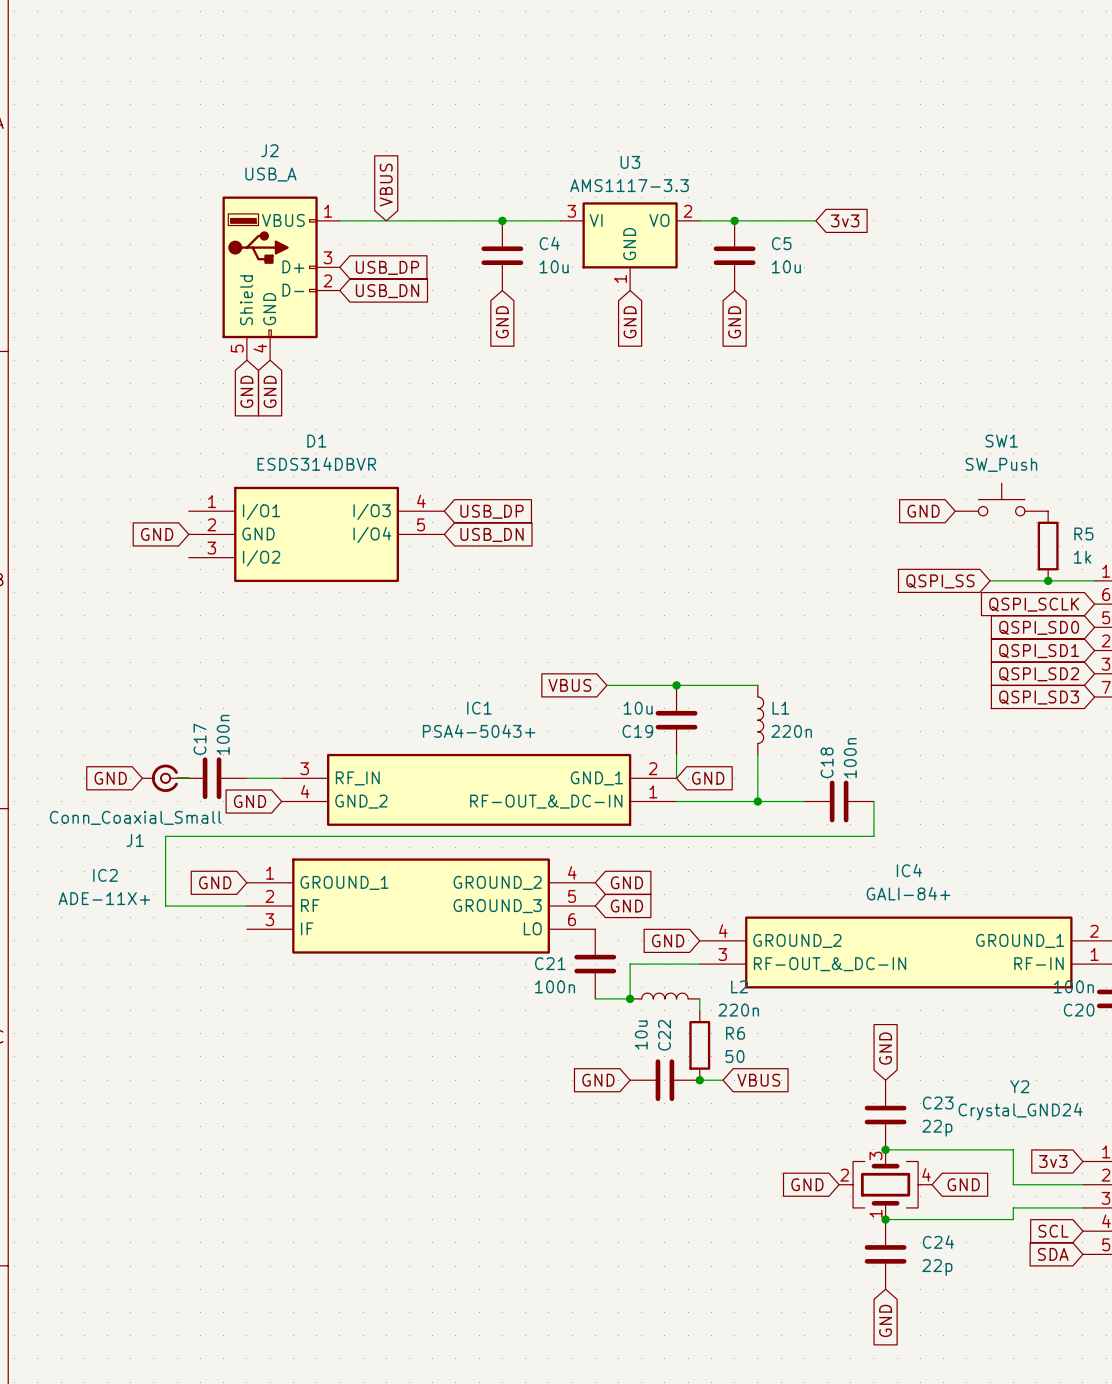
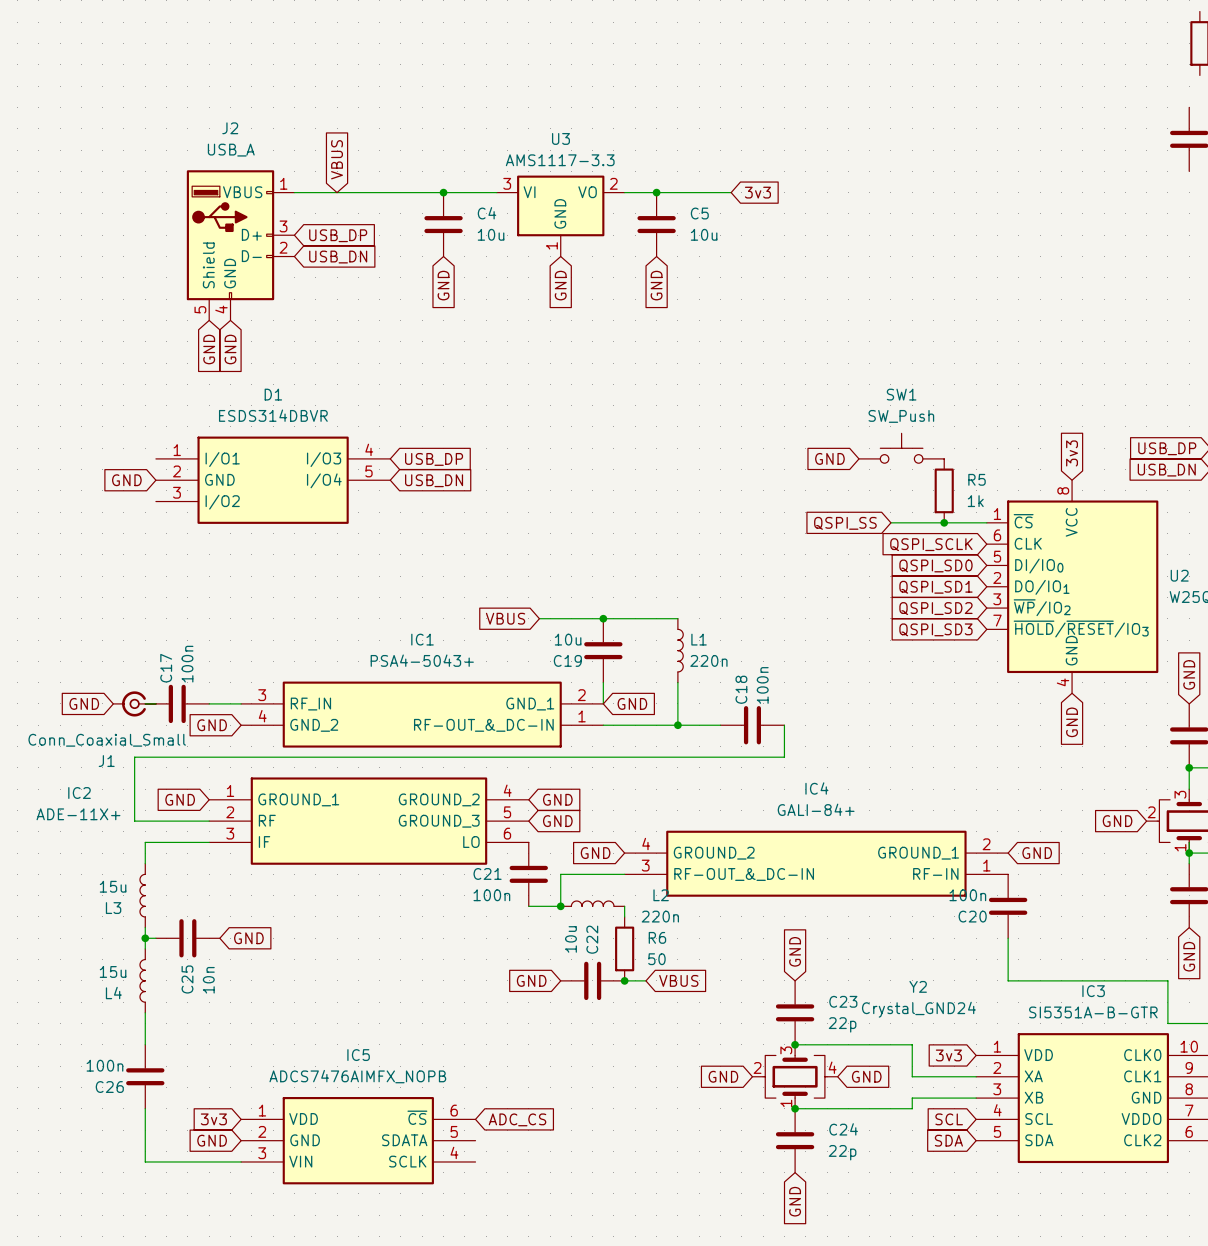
wire: none -> (209, 842) (145, 842) (145, 863)
L3: none -> 15u (142, 895)
wire: none -> (145, 927) (145, 948)
wire: none -> (145, 938) (155, 938)
junction: none -> (145, 938)
C25: none -> 10n (187, 938)
global label: none -> GND (248, 938)
L4: none -> 15u (142, 980)
wire: none -> (145, 1012) (145, 1044)
C26: none -> 100n (145, 1076)
wire: none -> (145, 1108) (145, 1161) (241, 1161)
global label: none -> 3v3 (213, 1119)
global label: none -> ADC_CS (517, 1119)
global label: none -> GND (212, 1140)
IC5: none -> ADCS7476AIMFX_NOPB (358, 1140)

